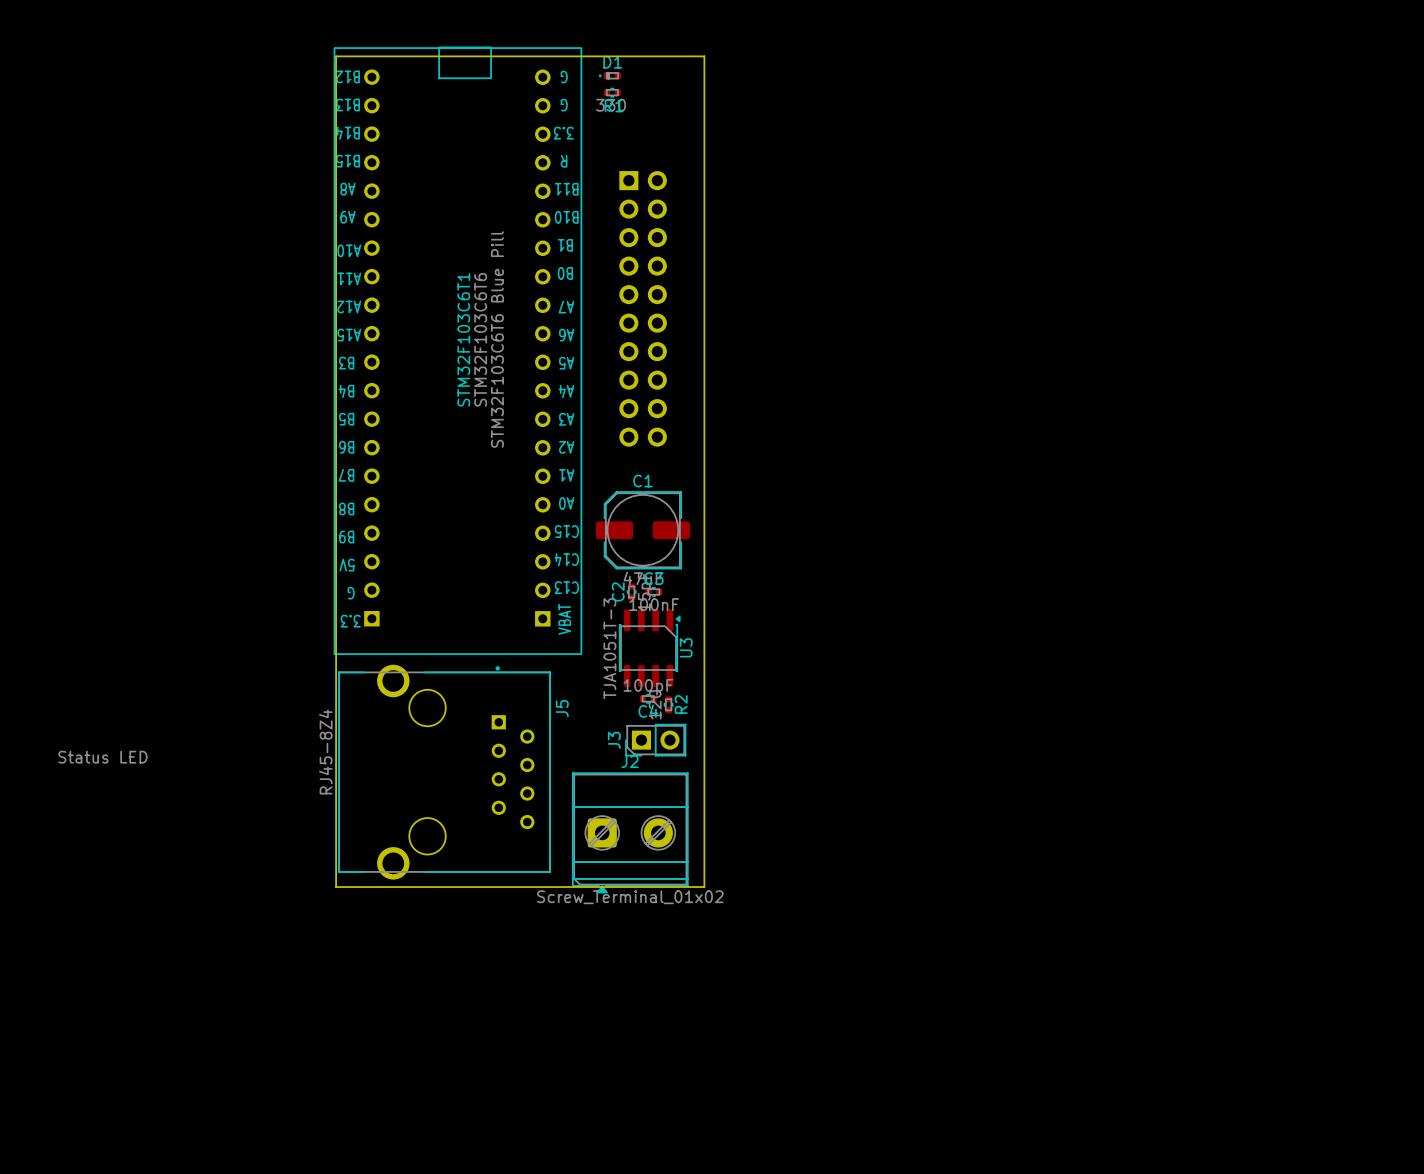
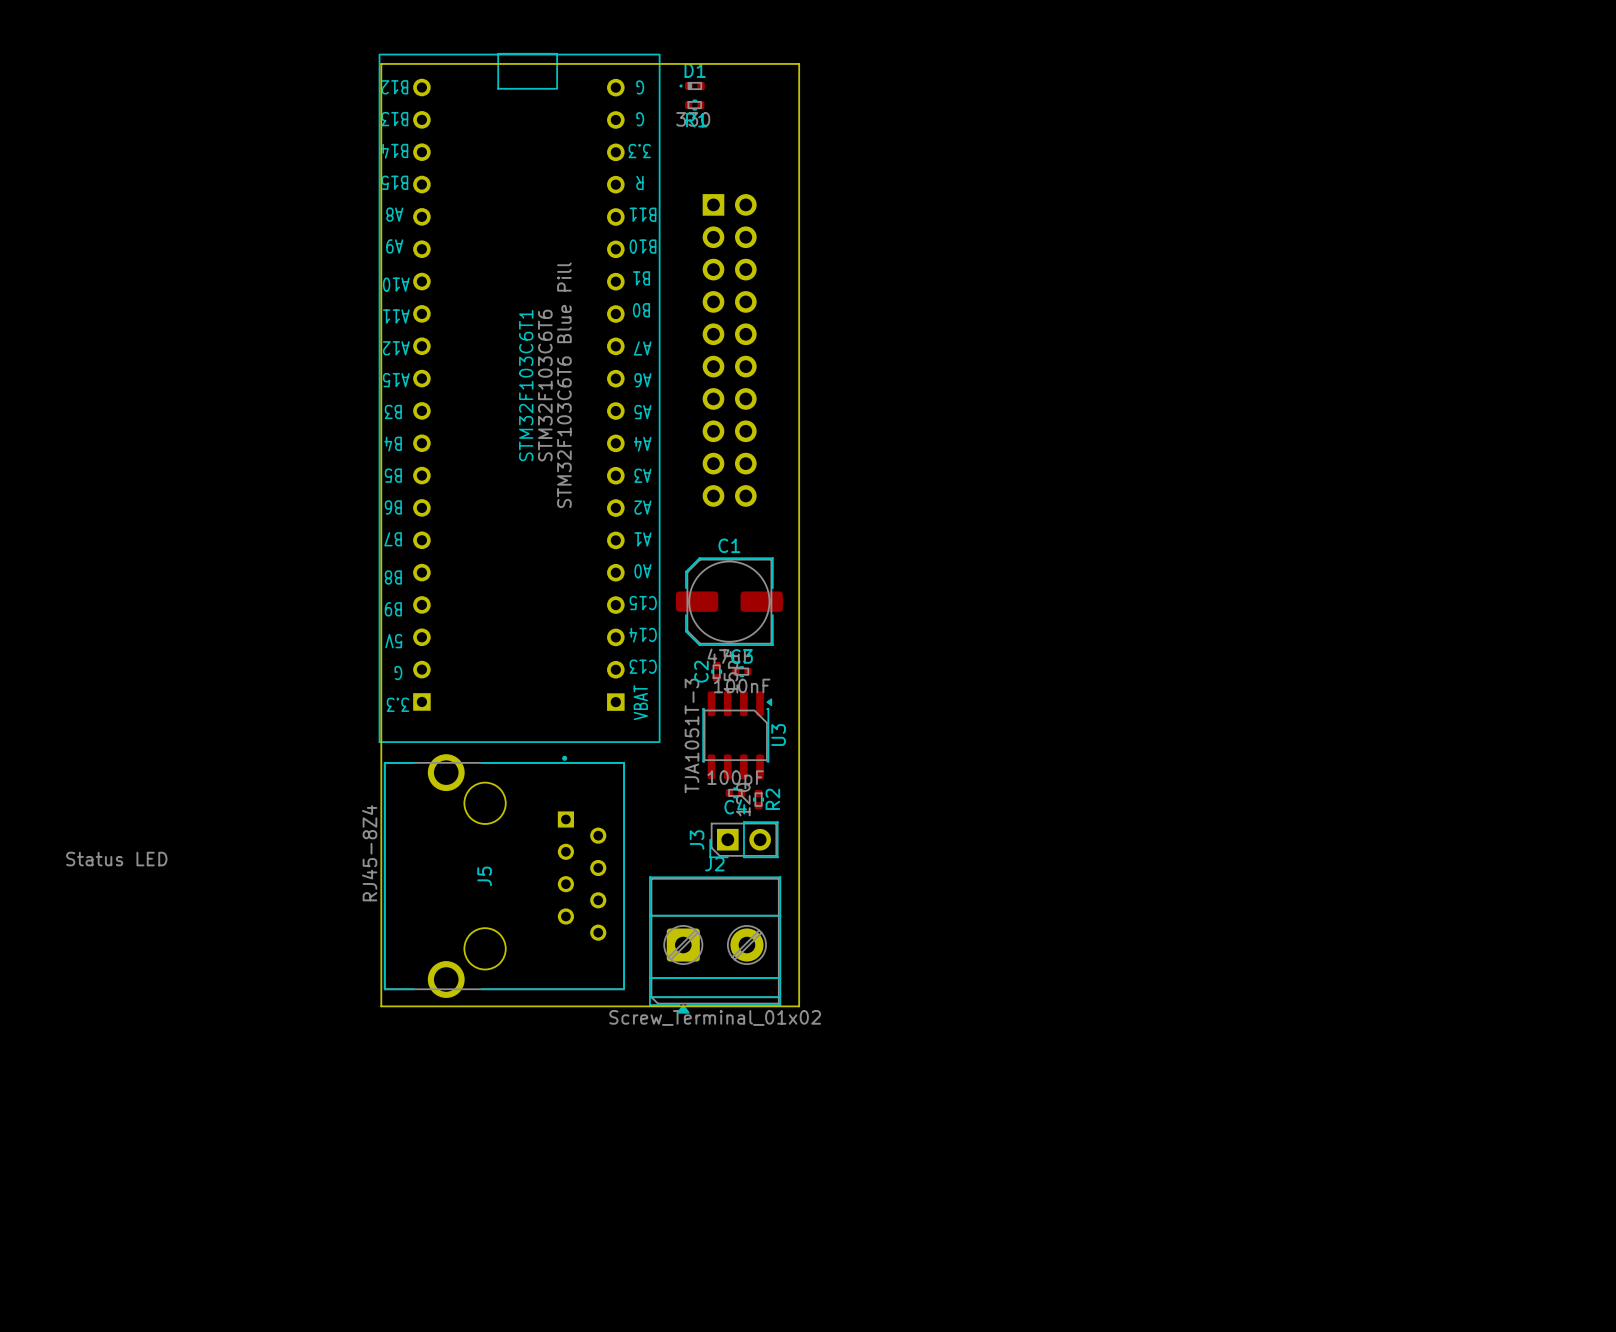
J5 name position: J5 (562, 708) -> J5 (484, 876)

